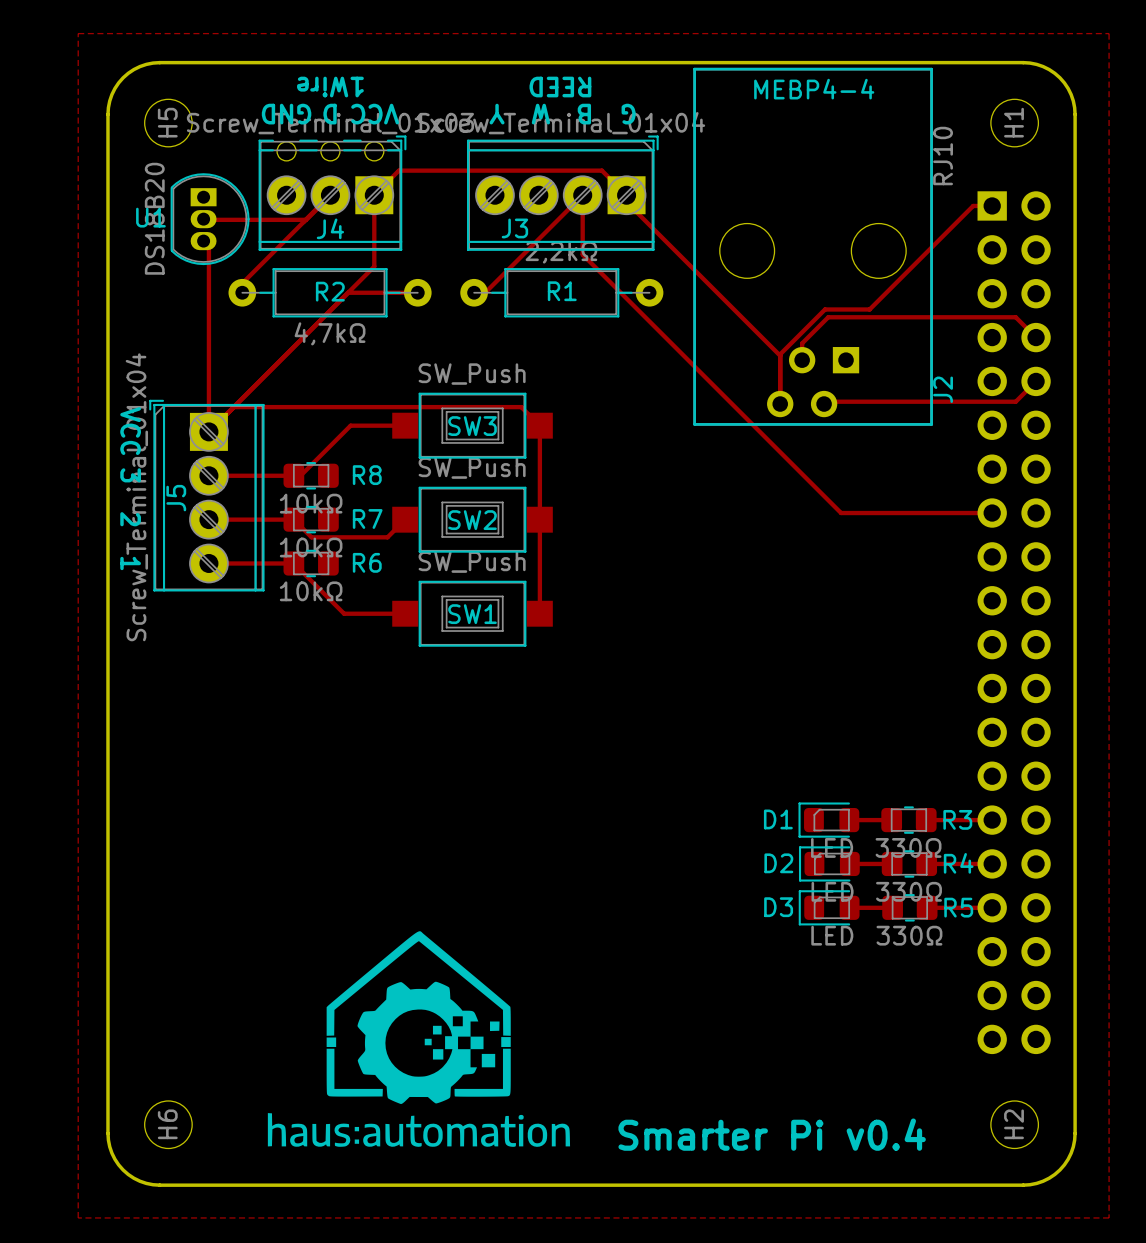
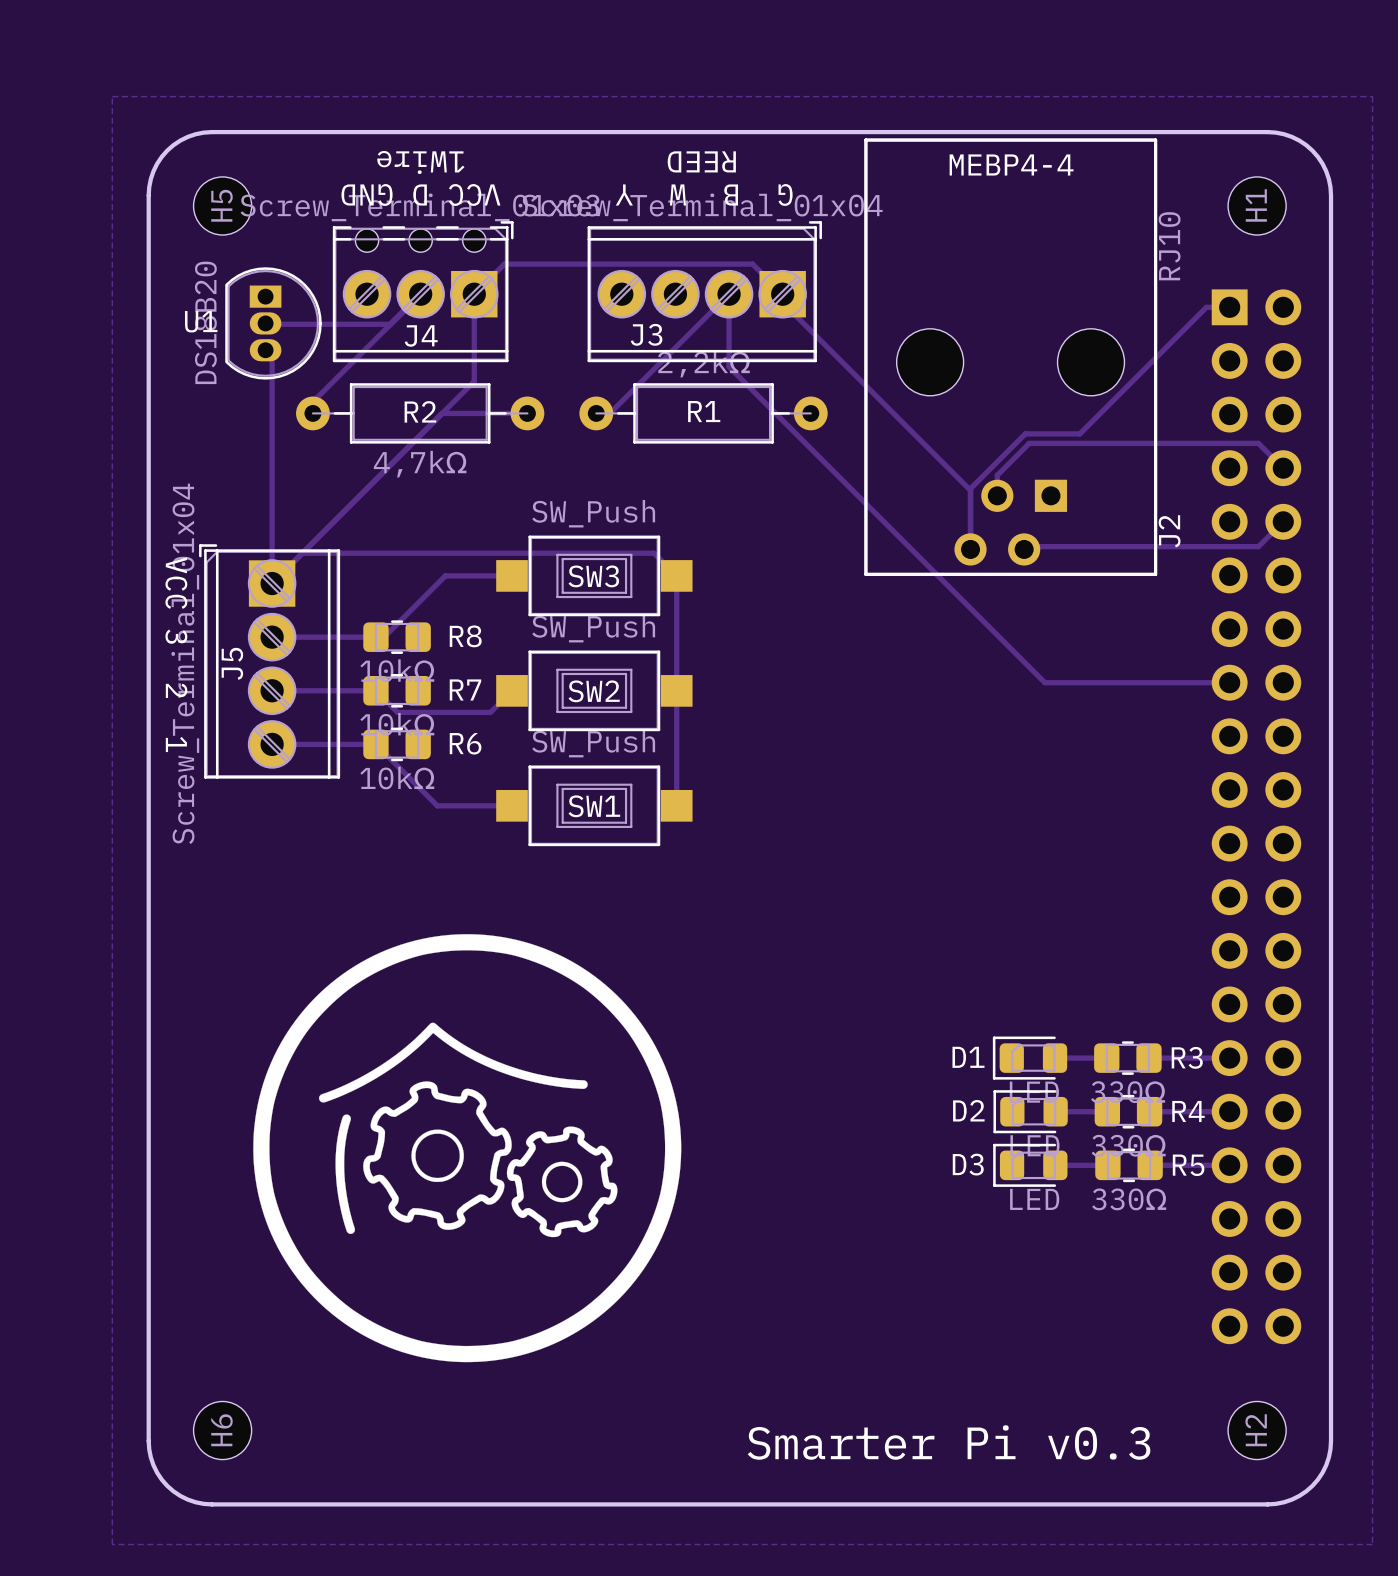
drawing: none -> [253, 934, 682, 1363]
drawing: [267, 931, 571, 1147] -> none
text: Smarter Pi v0.4 (772, 1134) -> Smarter Pi v0.3 (949, 1442)

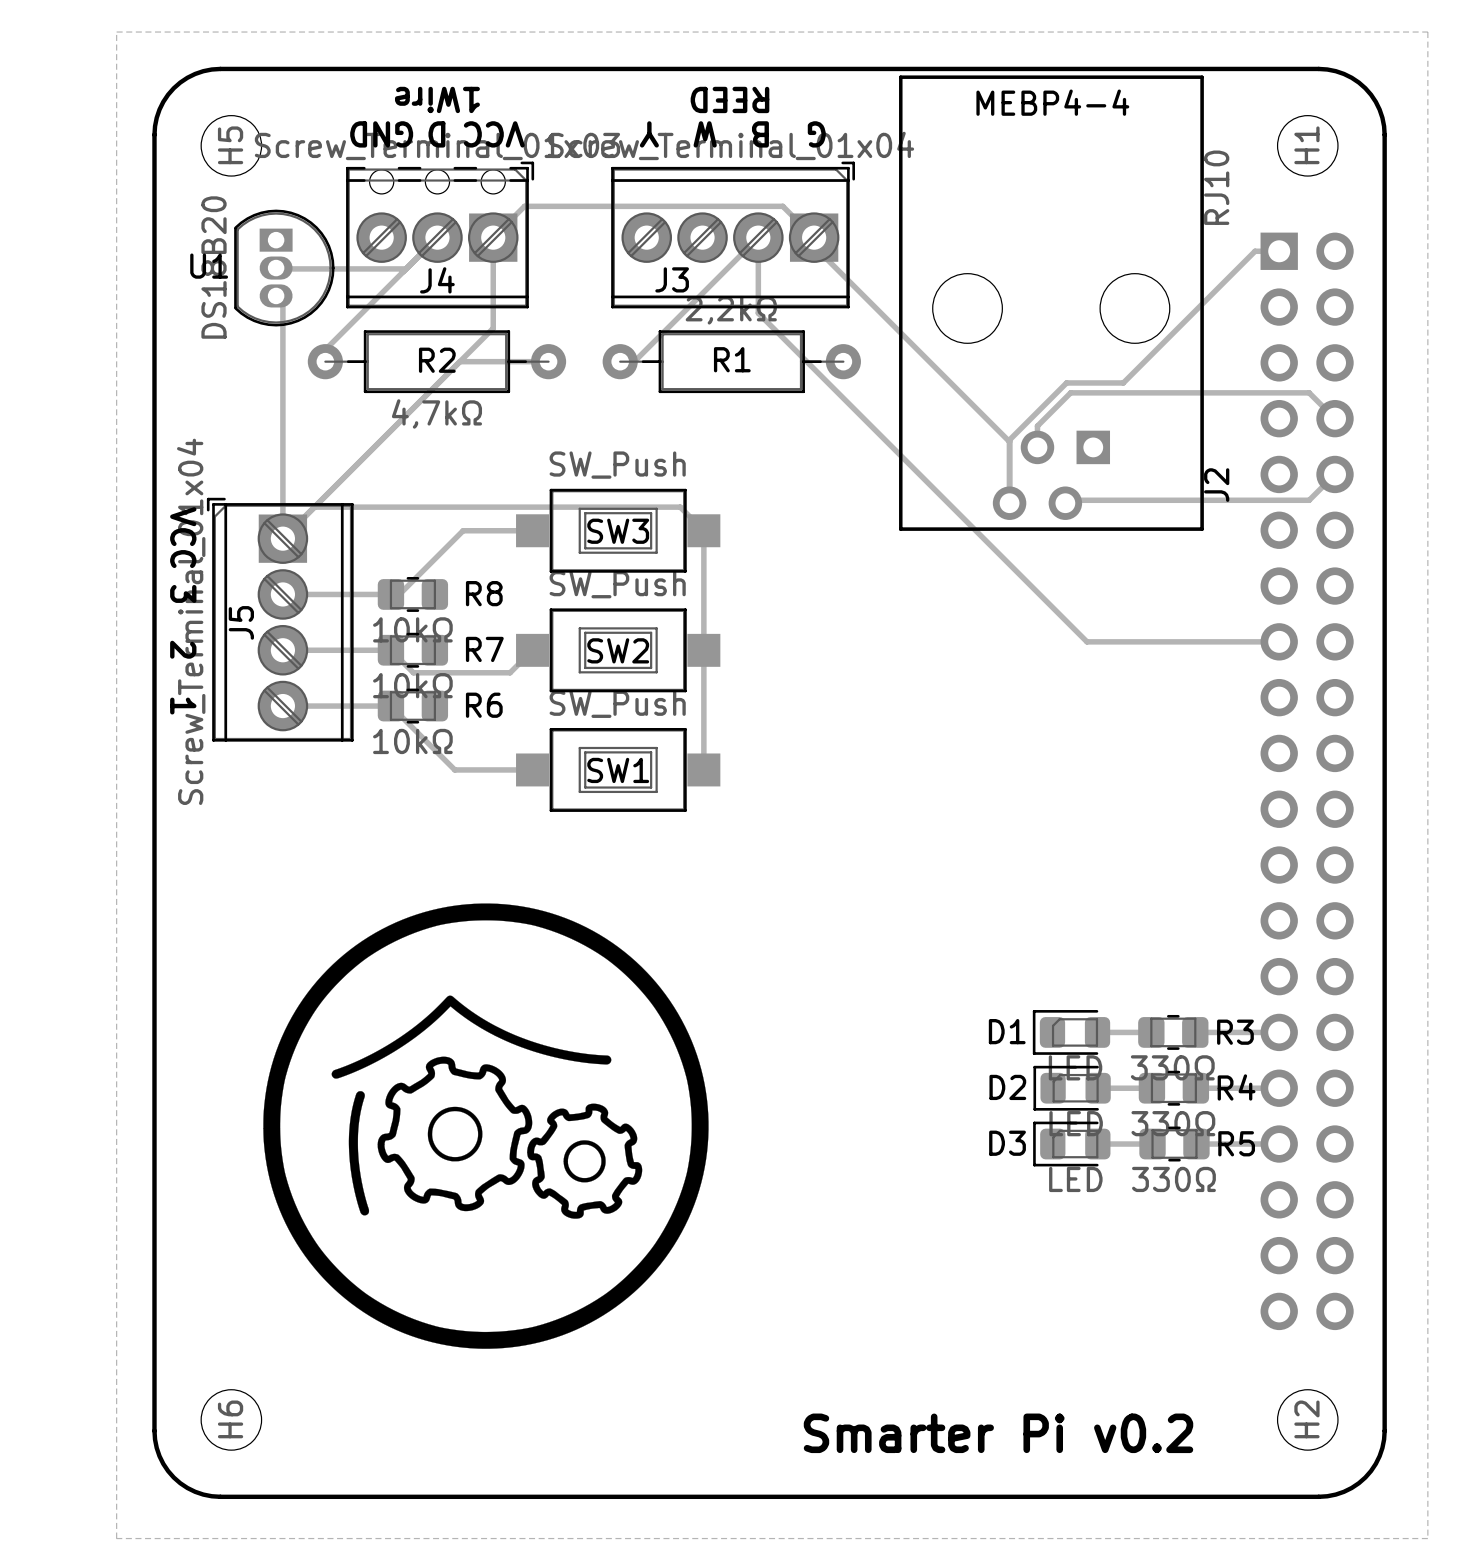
text: Smarter Pi v0.3 (949, 1442) -> Smarter Pi v0.2 (998, 1433)

